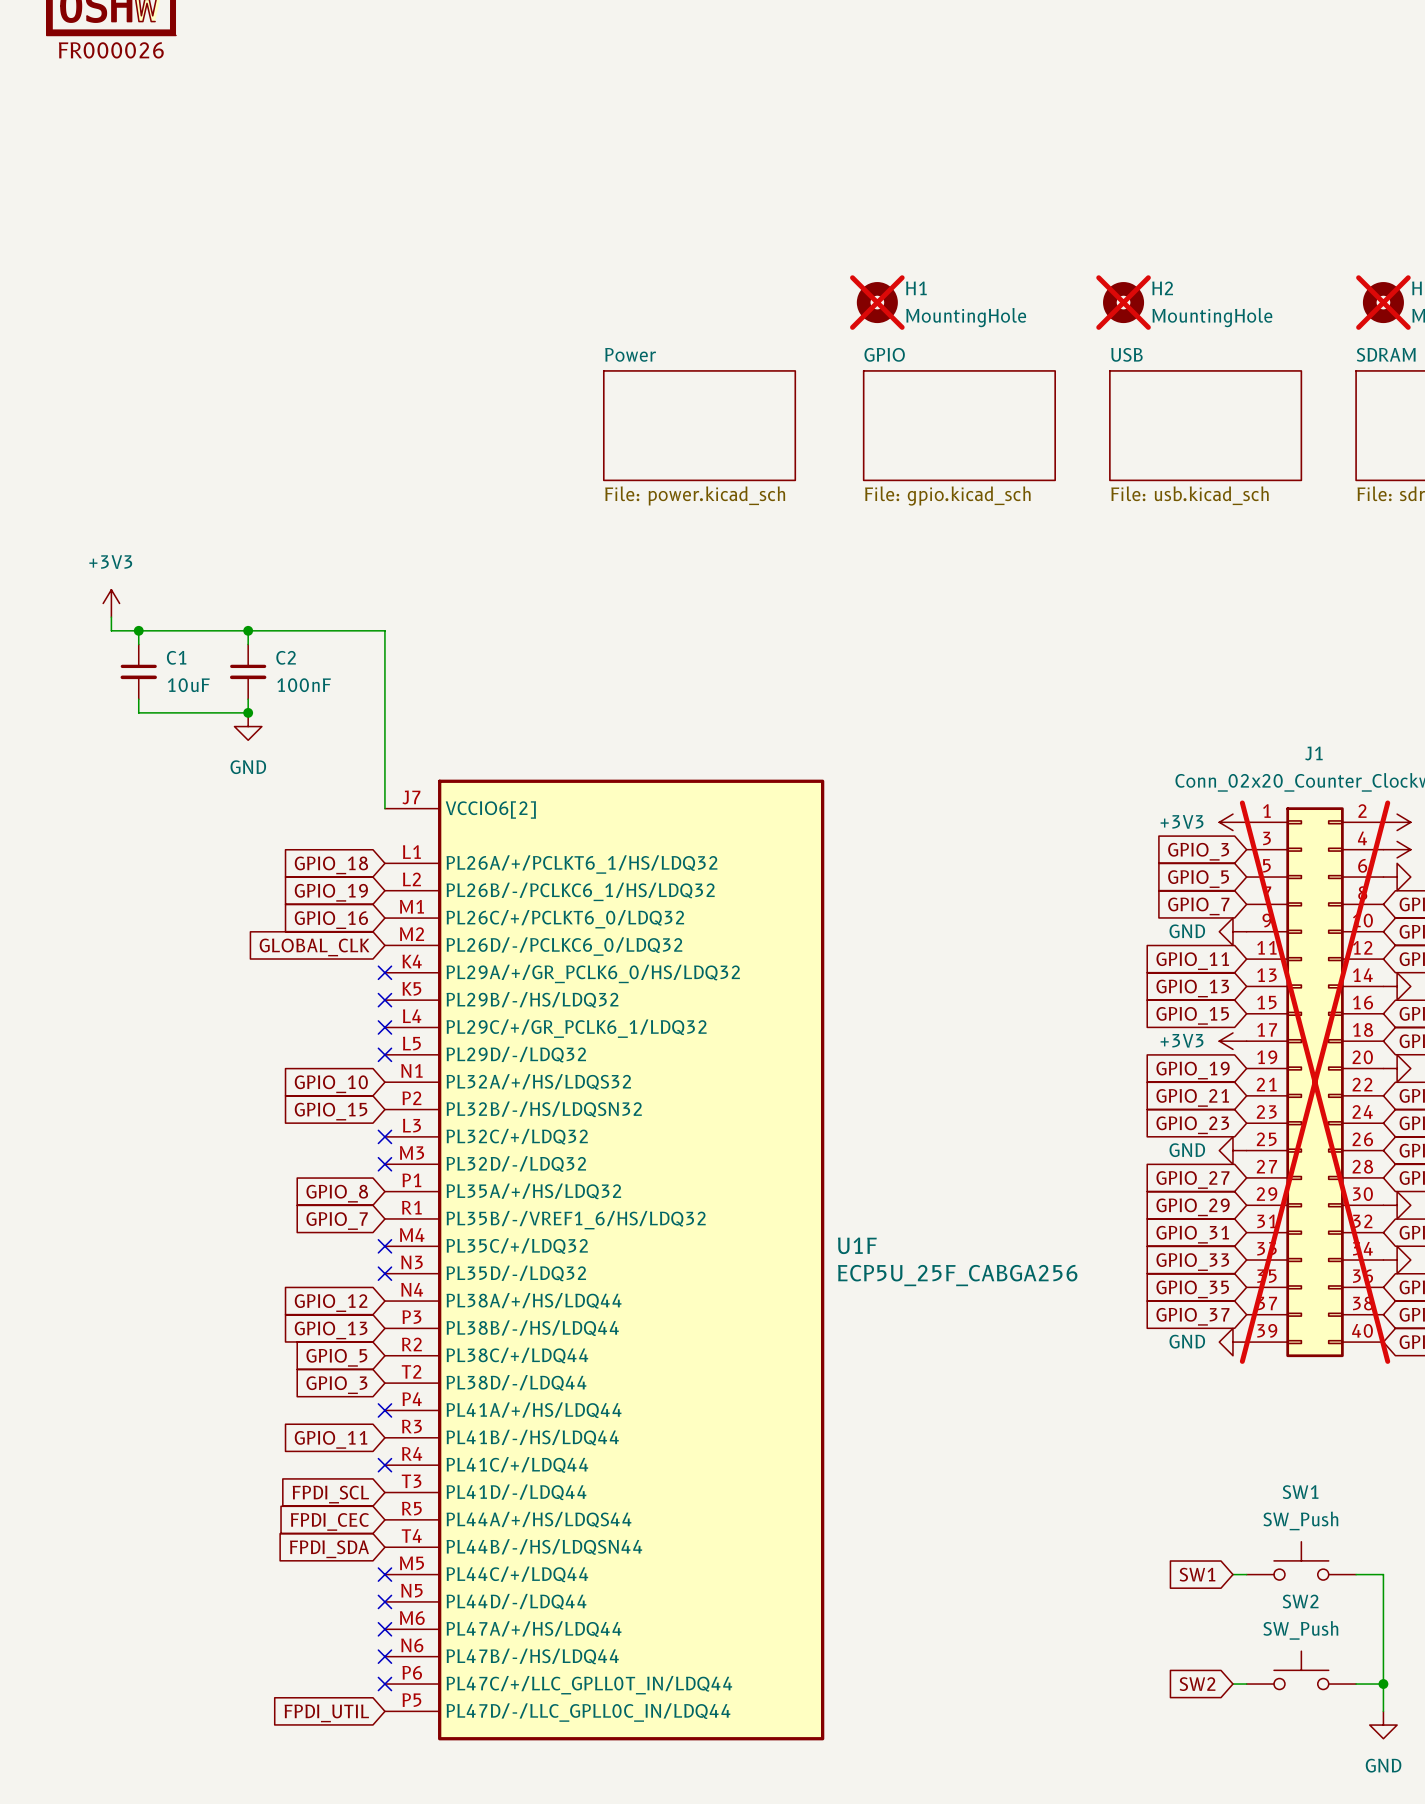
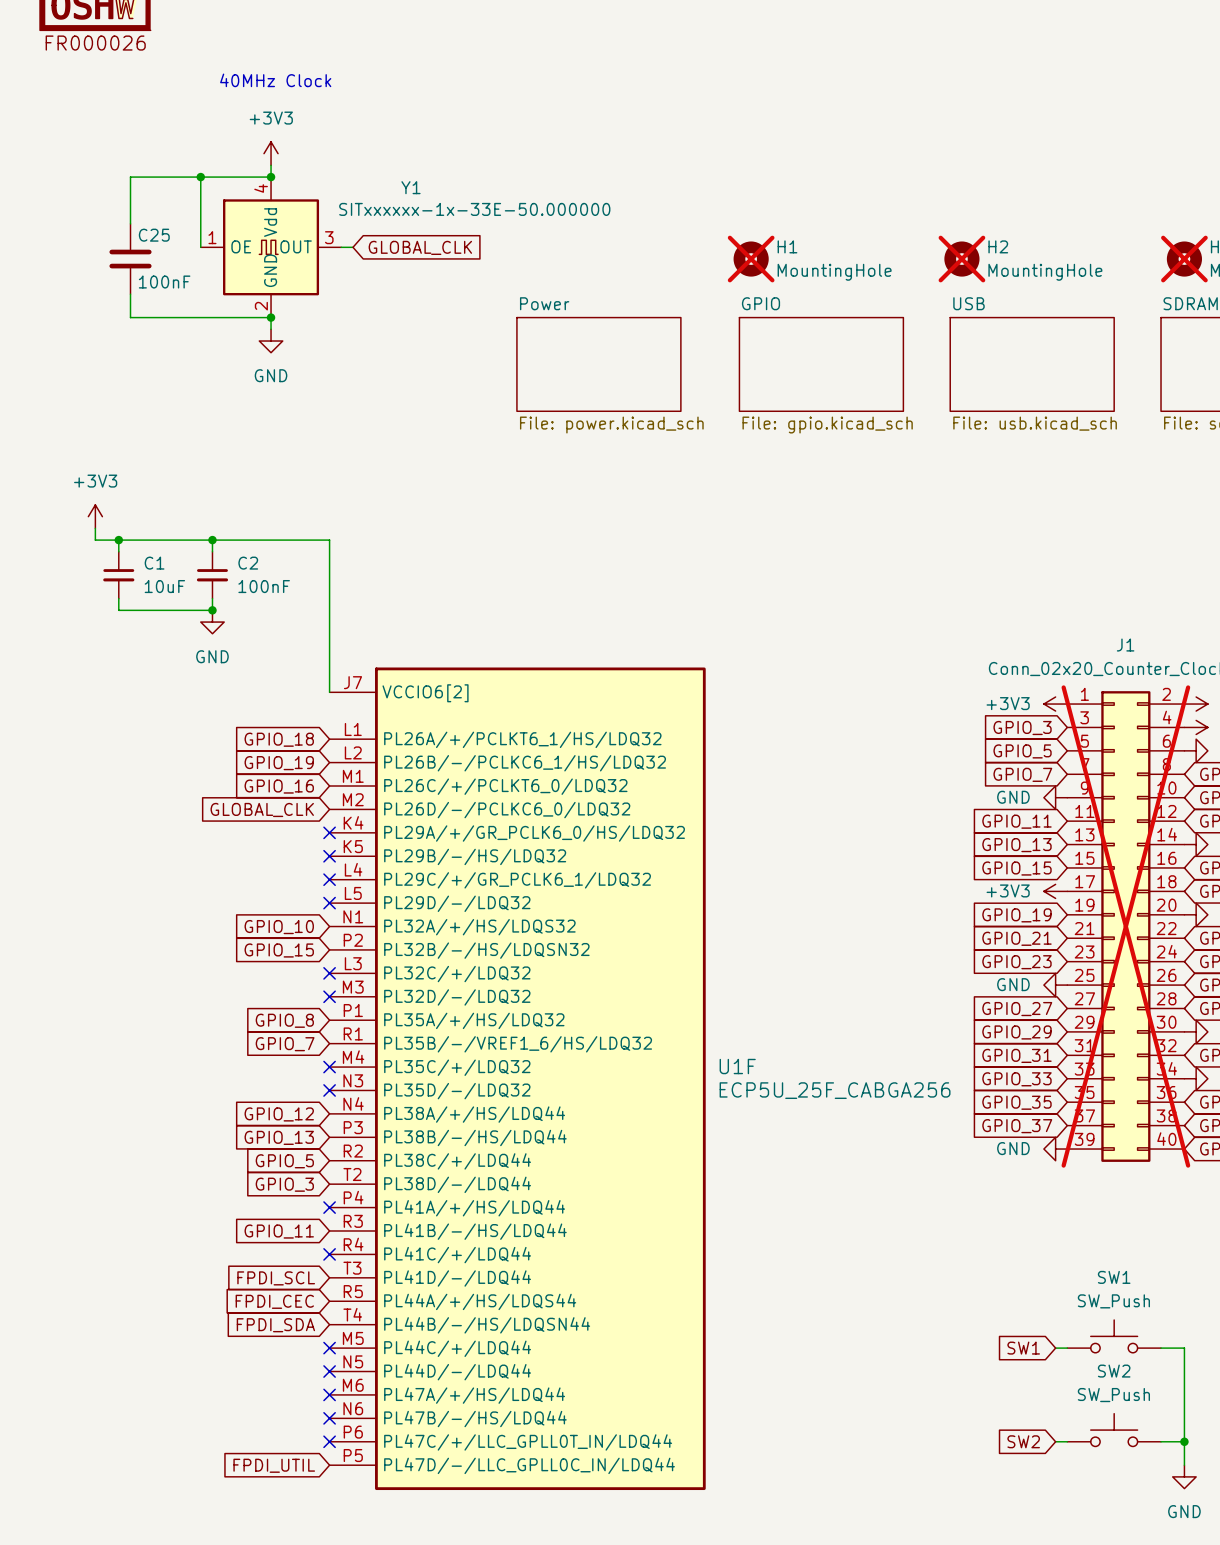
text: none -> 40MHz Clock (275, 80)
power symbol: none -> +3V3 (271, 153)
wire: none -> (271, 165) (271, 177) (130, 177) (130, 223)
wire: none -> (200, 177) (200, 247)
junction: none -> (200, 177)
junction: none -> (271, 177)
Y1: none -> SITxxxxxx-1x-33E-50.000000 (271, 247)
wire: none -> (341, 247) (353, 247)
global label: none -> GLOBAL_CLK (420, 247)
C25: none -> 100nF (130, 259)
wire: none -> (130, 294) (130, 317) (271, 317) (271, 329)
junction: none -> (271, 317)
power symbol: none -> GND (271, 341)

